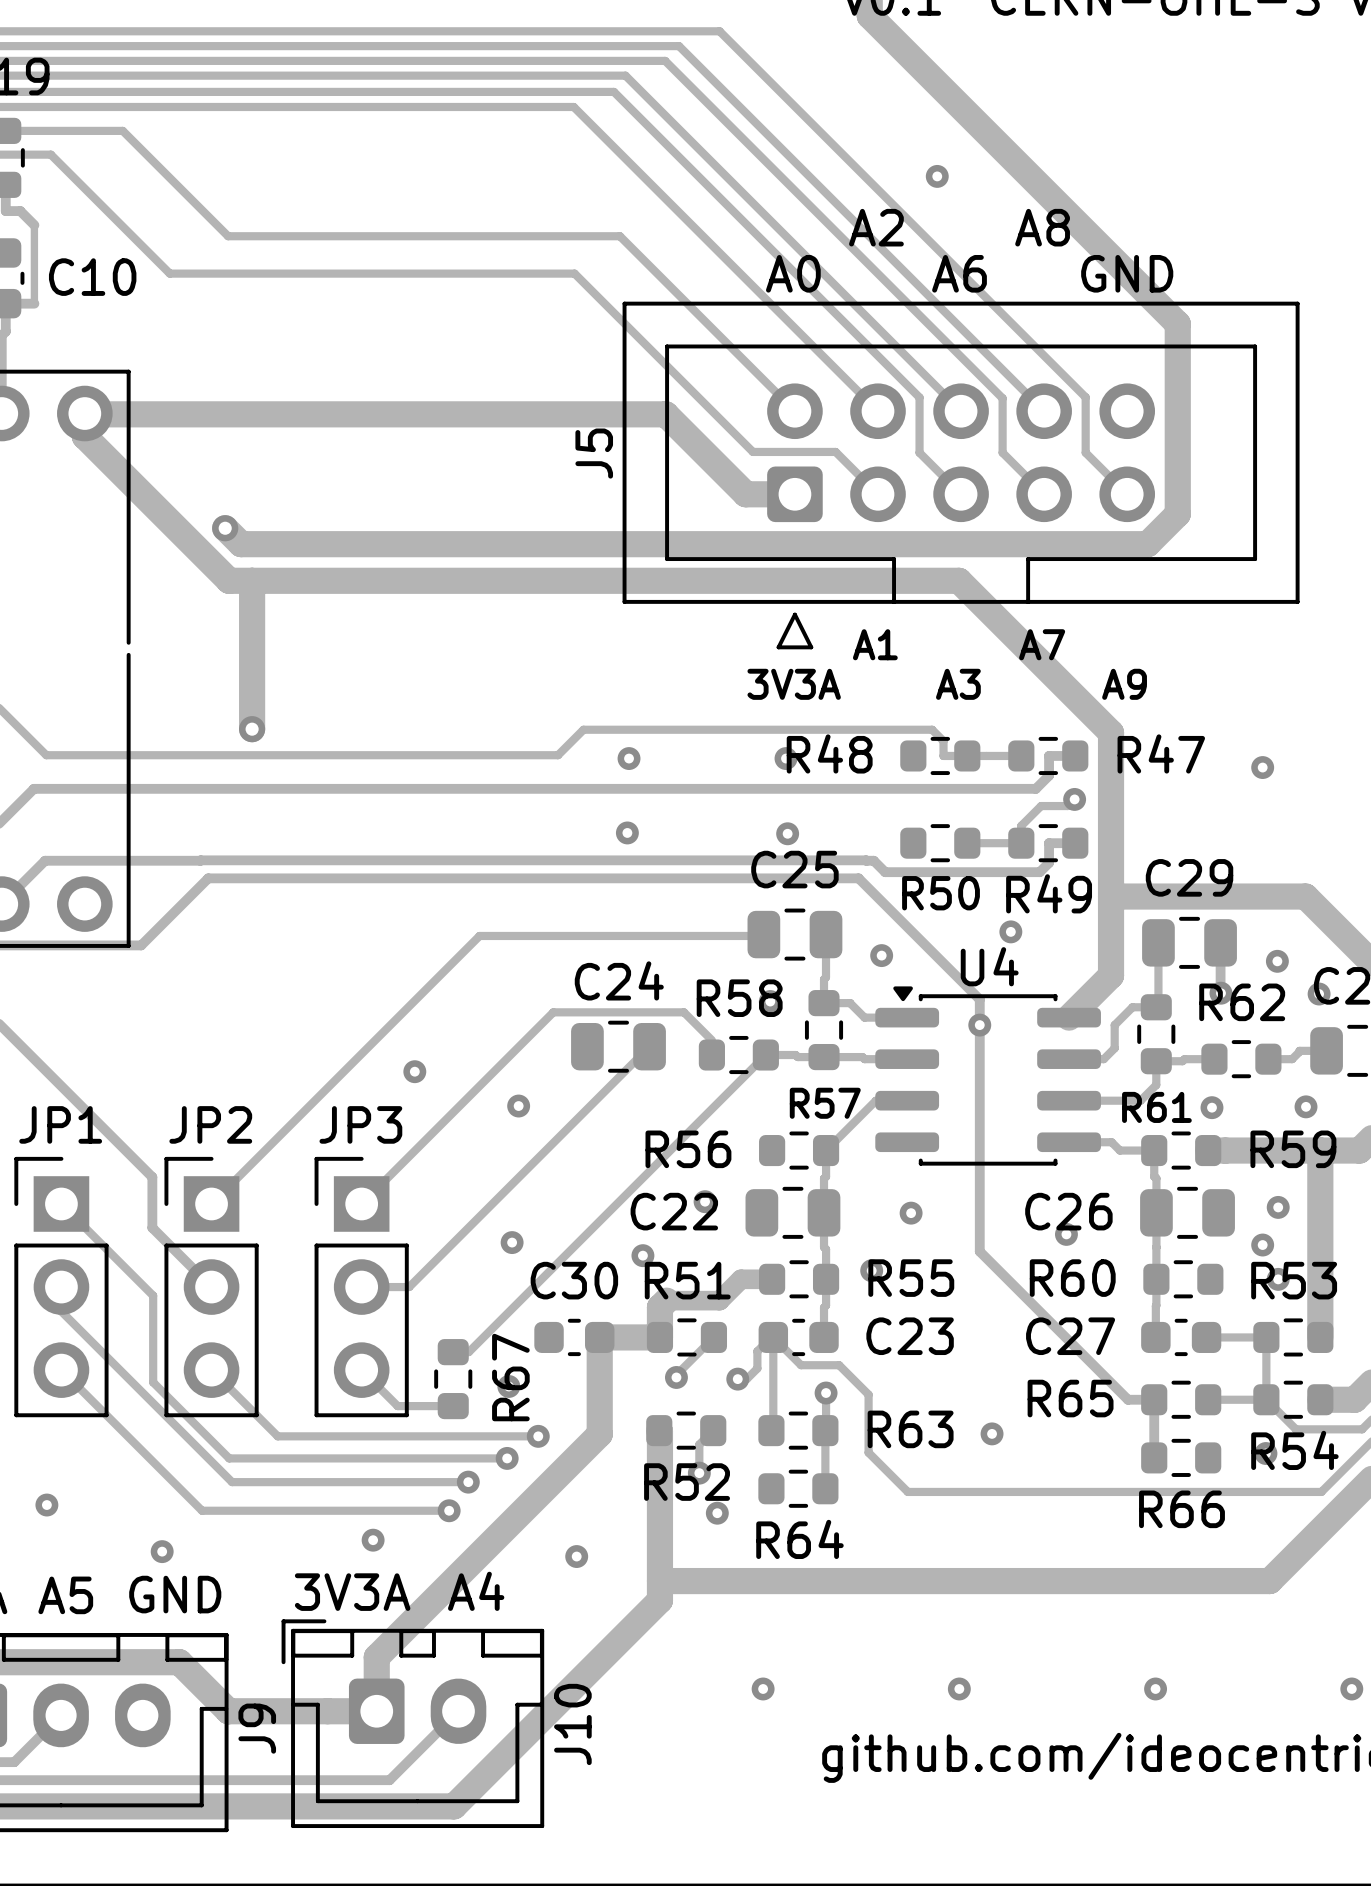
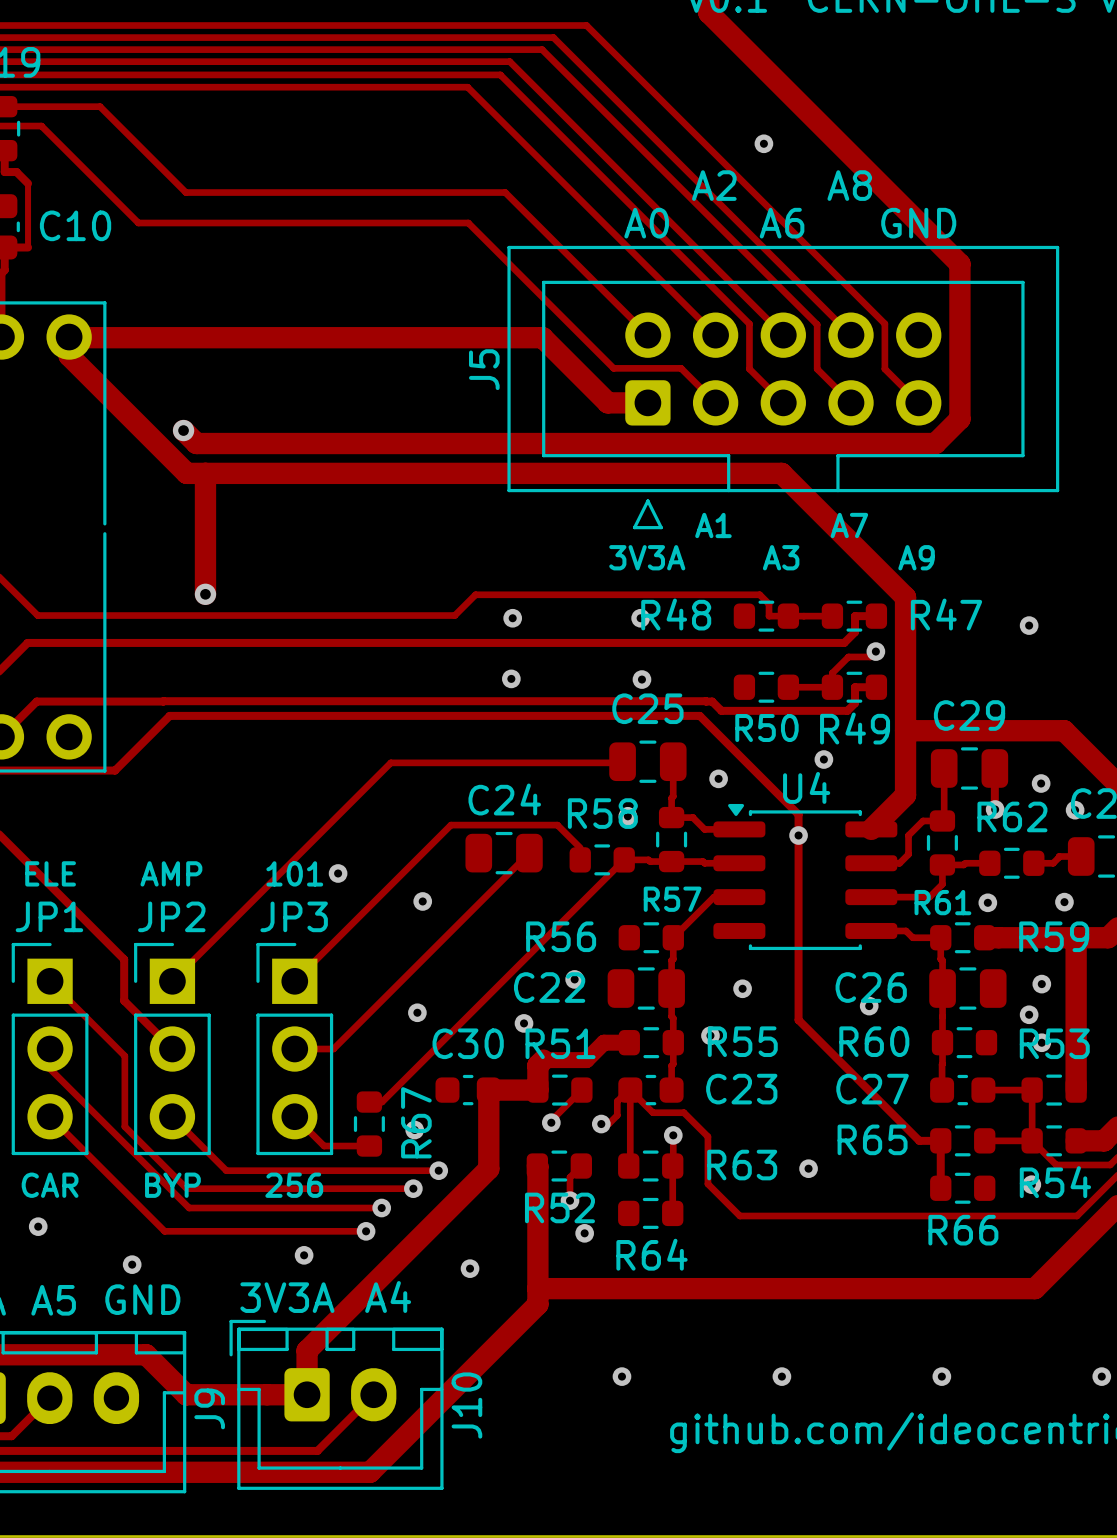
text: none -> ELE (50, 873)
text: none -> AMP (171, 873)
text: none -> 101 (294, 873)
text: none -> CAR (50, 1185)
text: none -> BYP (172, 1185)
text: none -> 256 (294, 1185)

